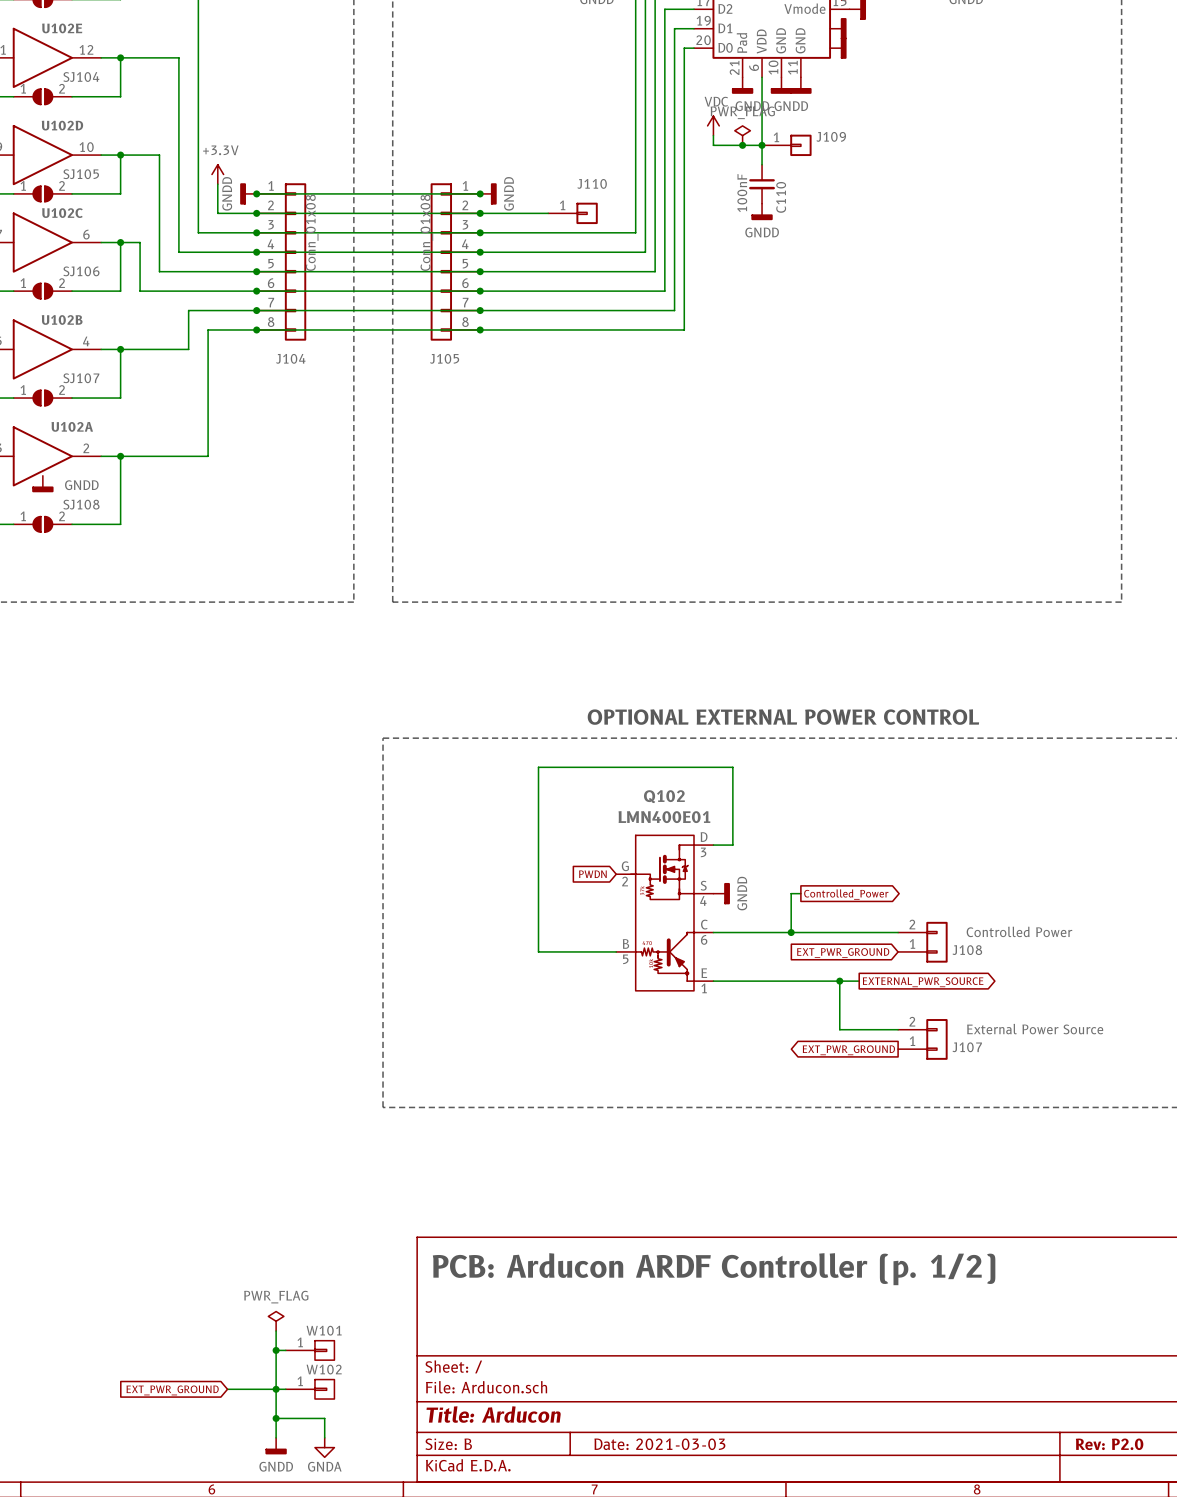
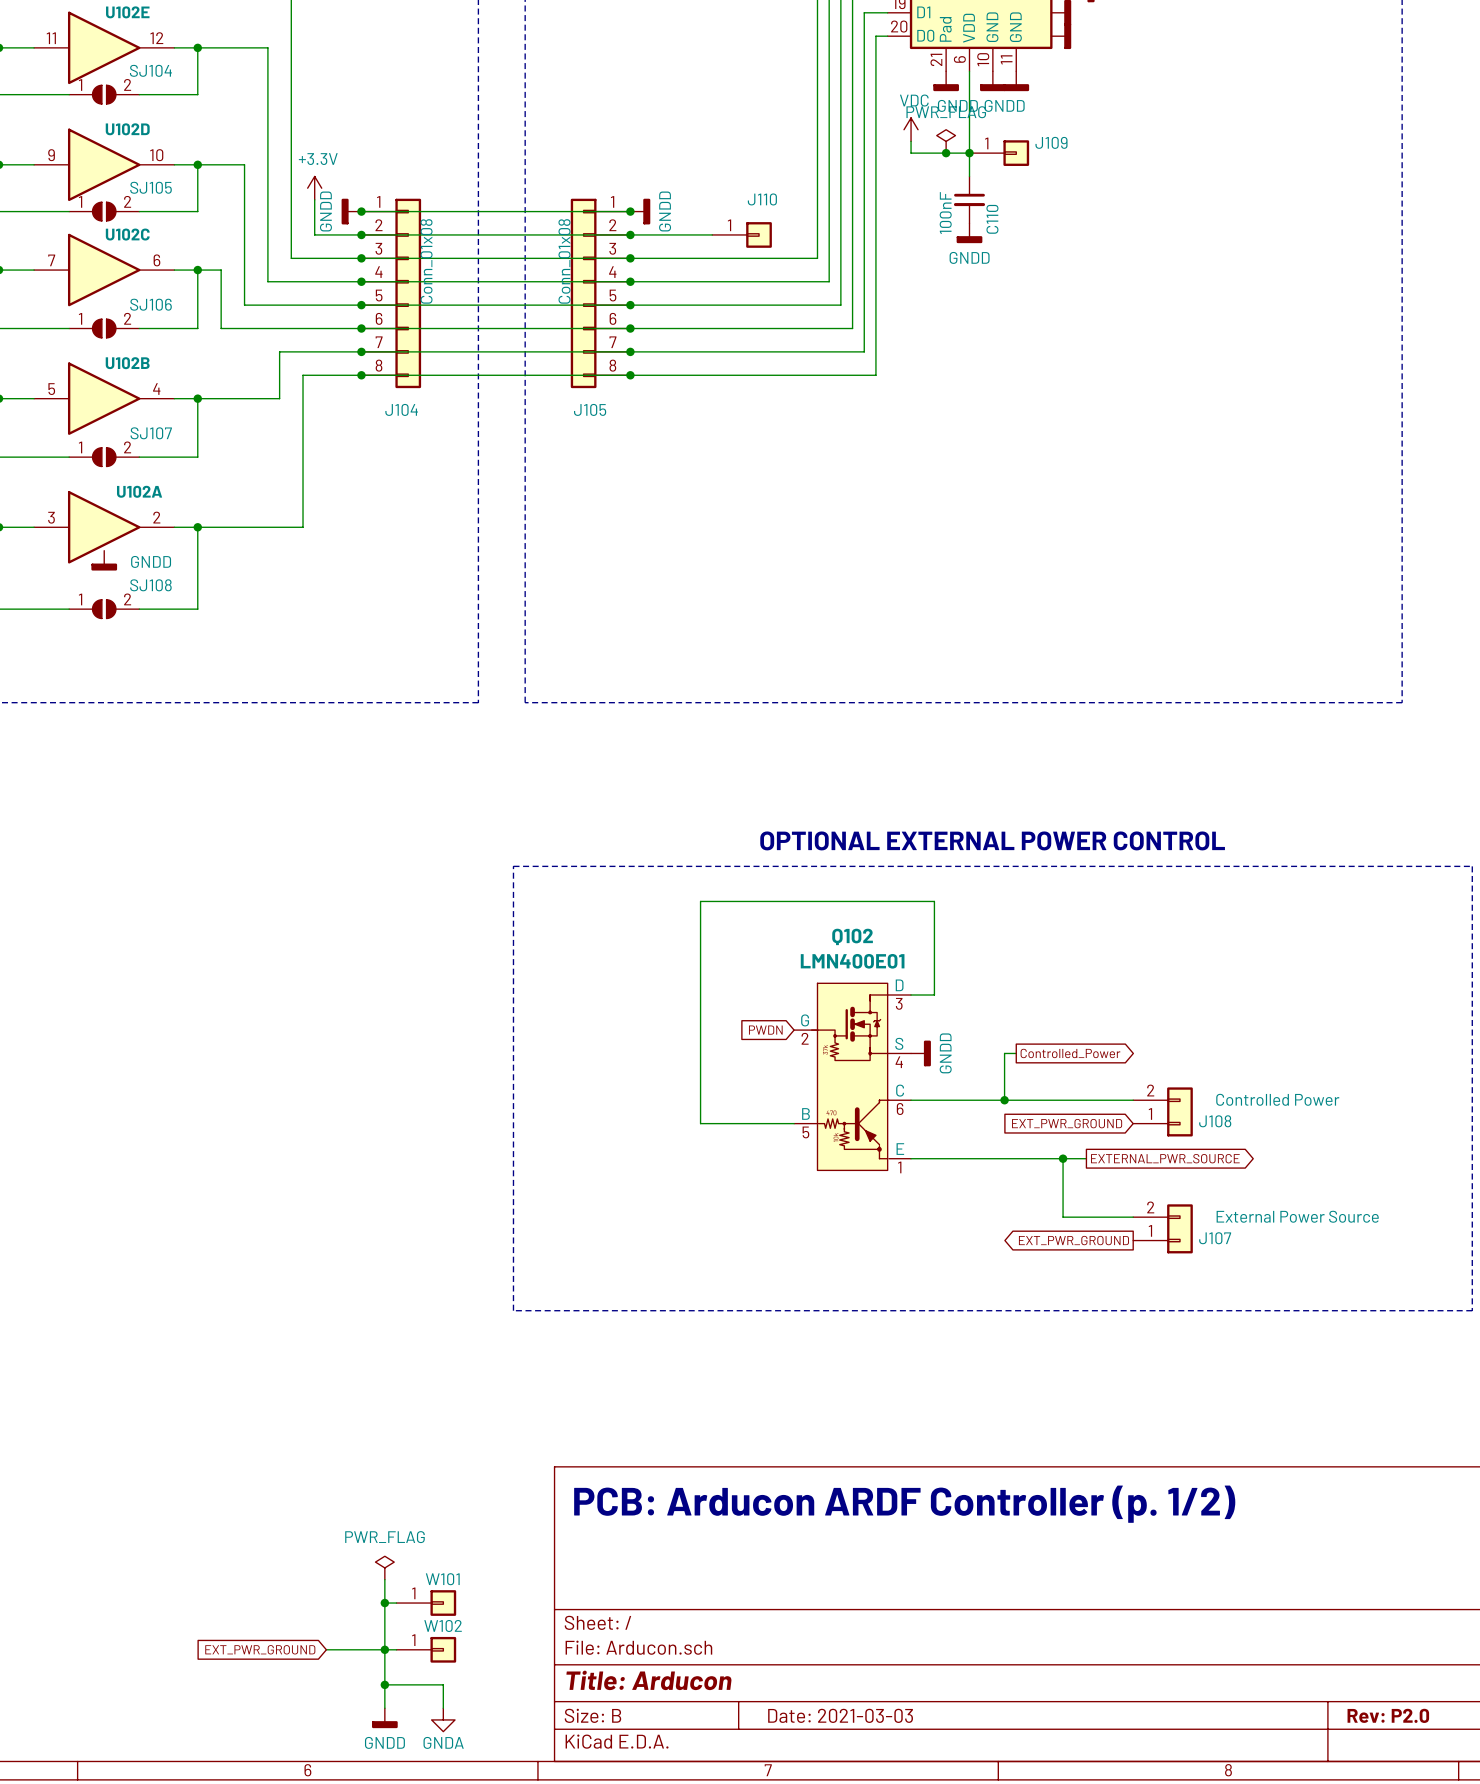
W101 symbol: [285, 1340, 335, 1361] -> [396, 1590, 457, 1616]
W102 symbol: [285, 1379, 335, 1400] -> [396, 1636, 457, 1663]

